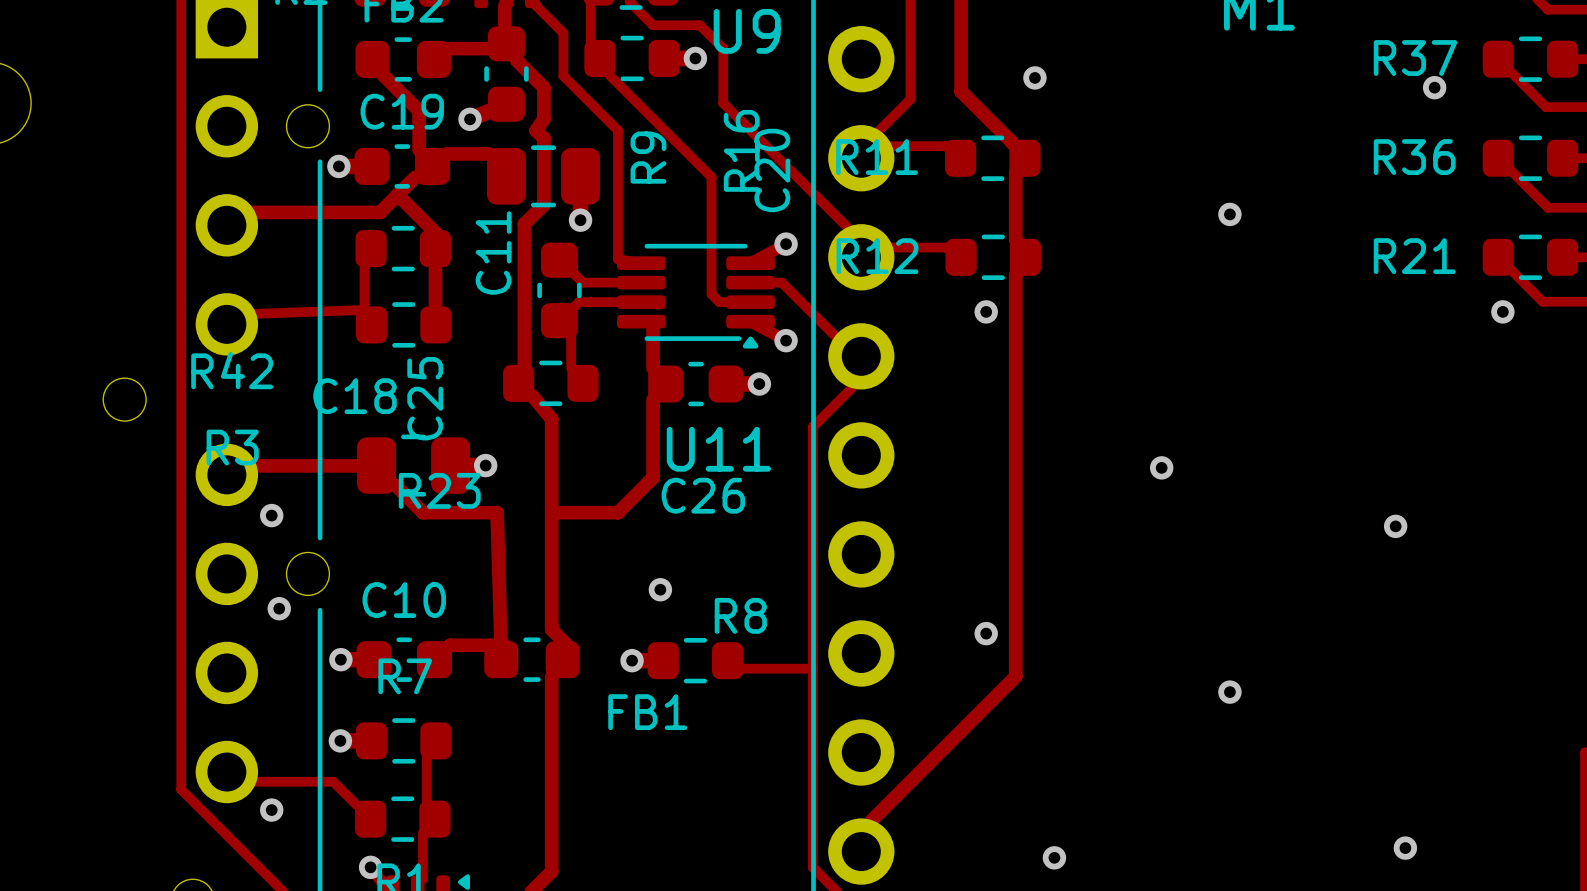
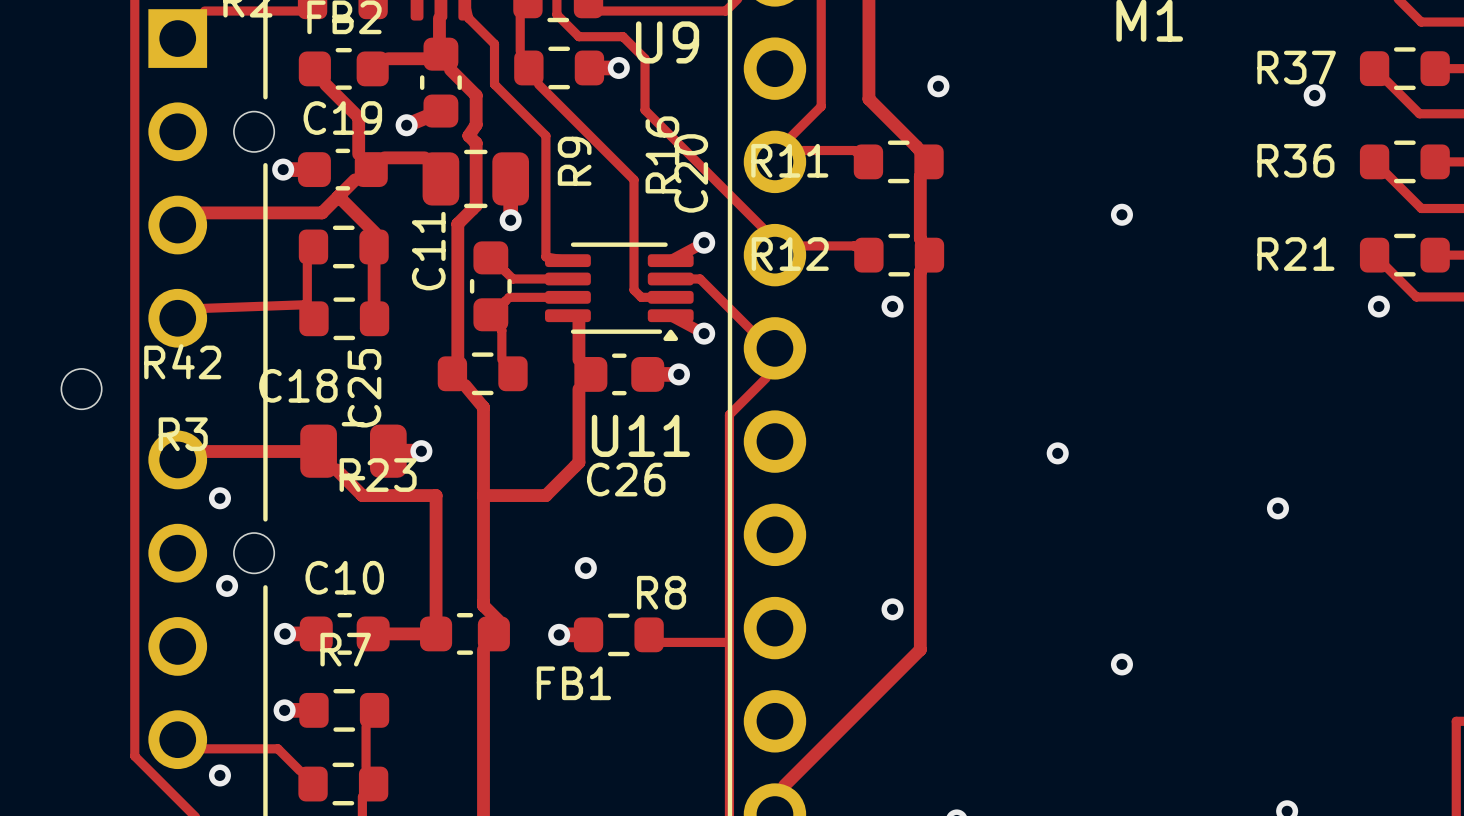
track: (497, 512) (500, 645) -> (432, 495) (436, 495) (436, 633) (373, 633)
track: (504, 645) (450, 645) (434, 659) -> none

